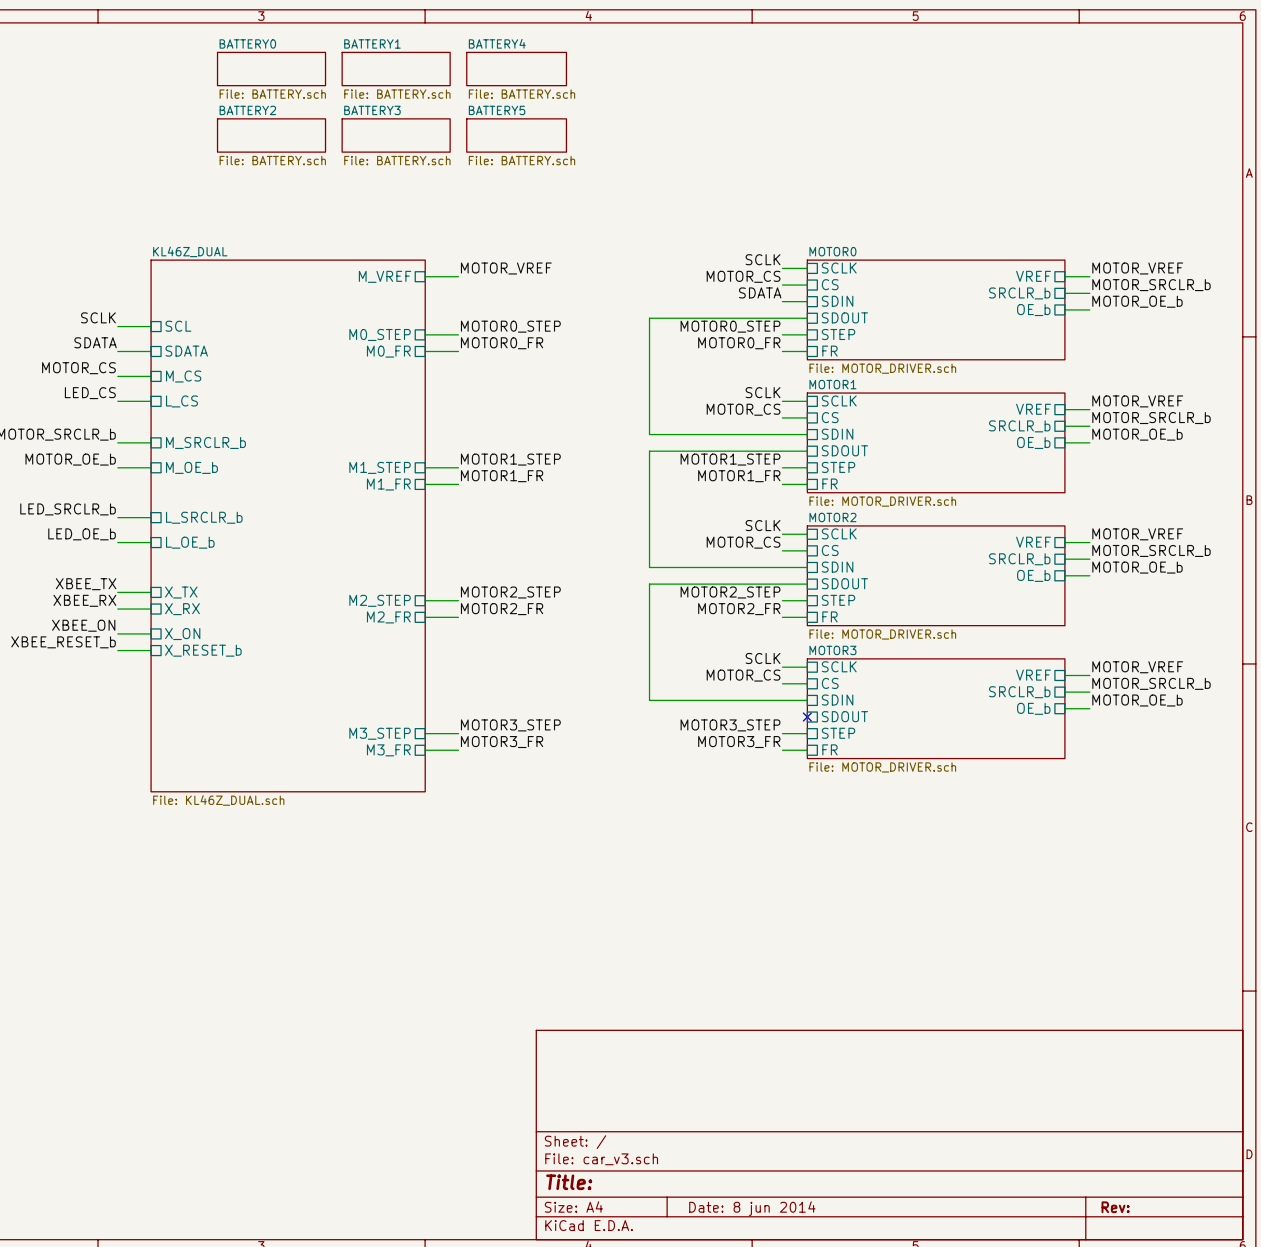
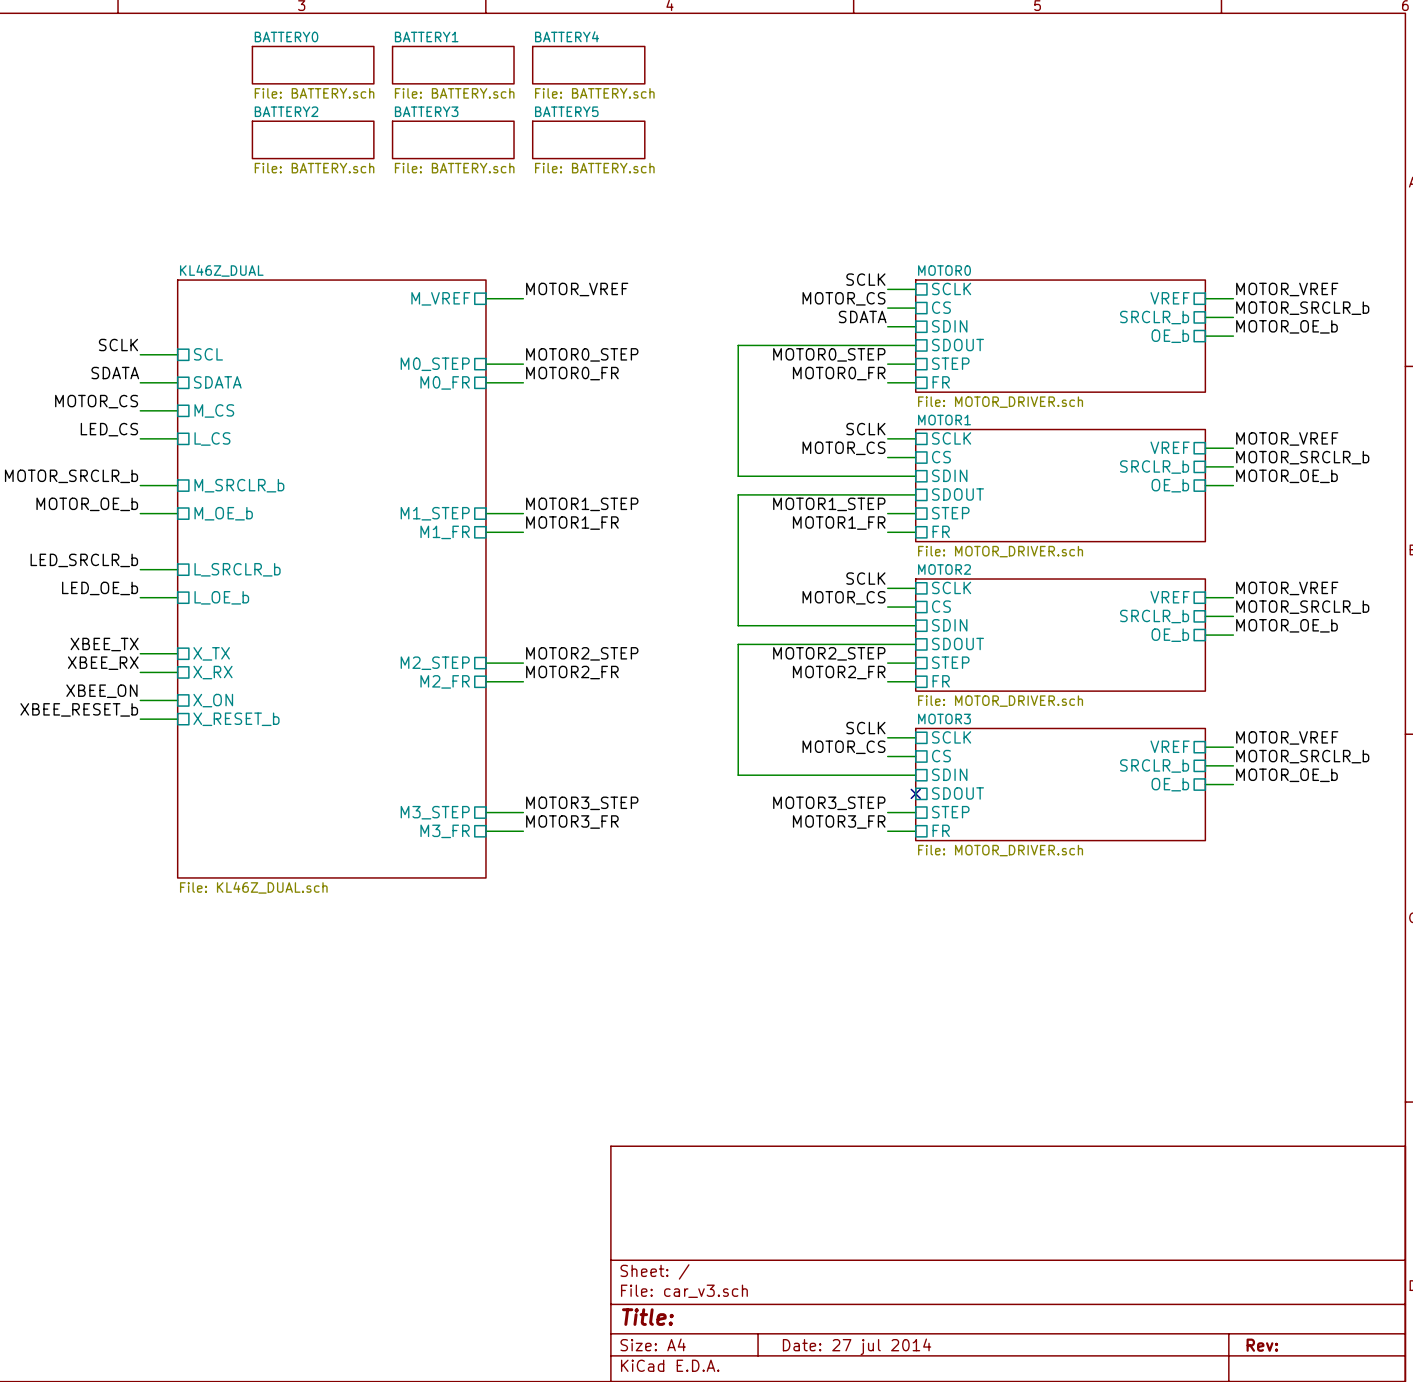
title block: Date: 8 jun 2014 (752, 1208) -> Date: 27 jul 2014 (857, 1346)

